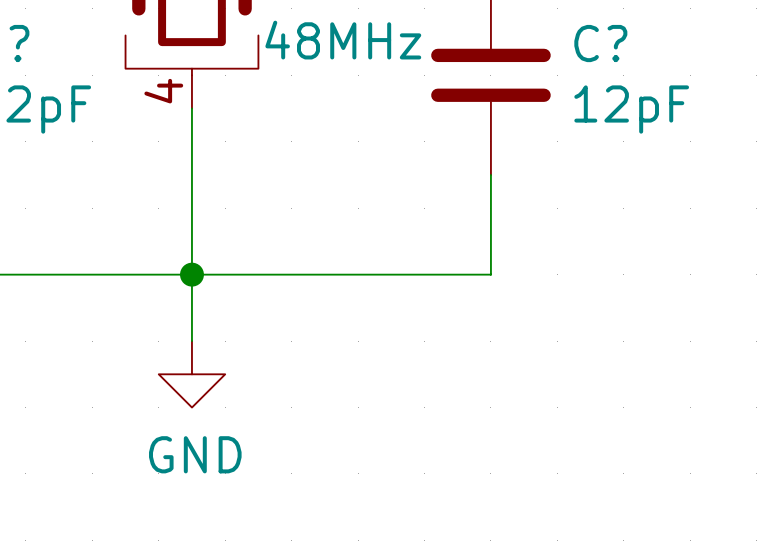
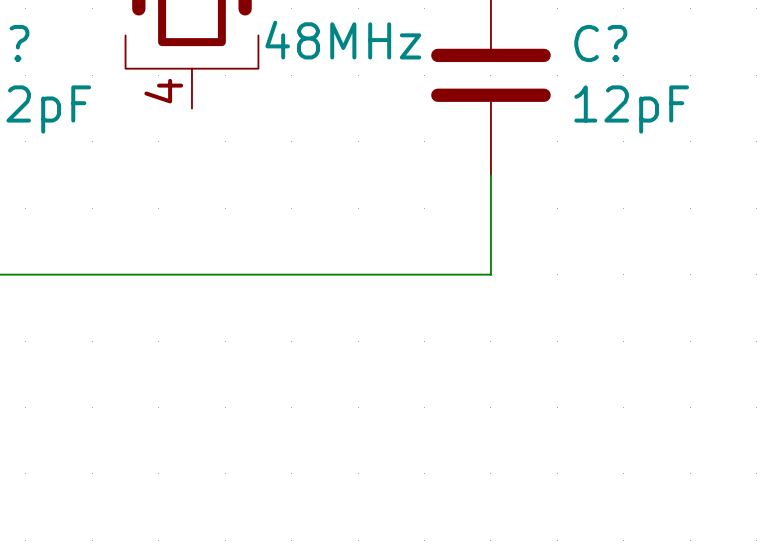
wire: (191, 108) (191, 341) -> none
junction: (191, 274) -> none
power symbol: GND (191, 374) -> none

